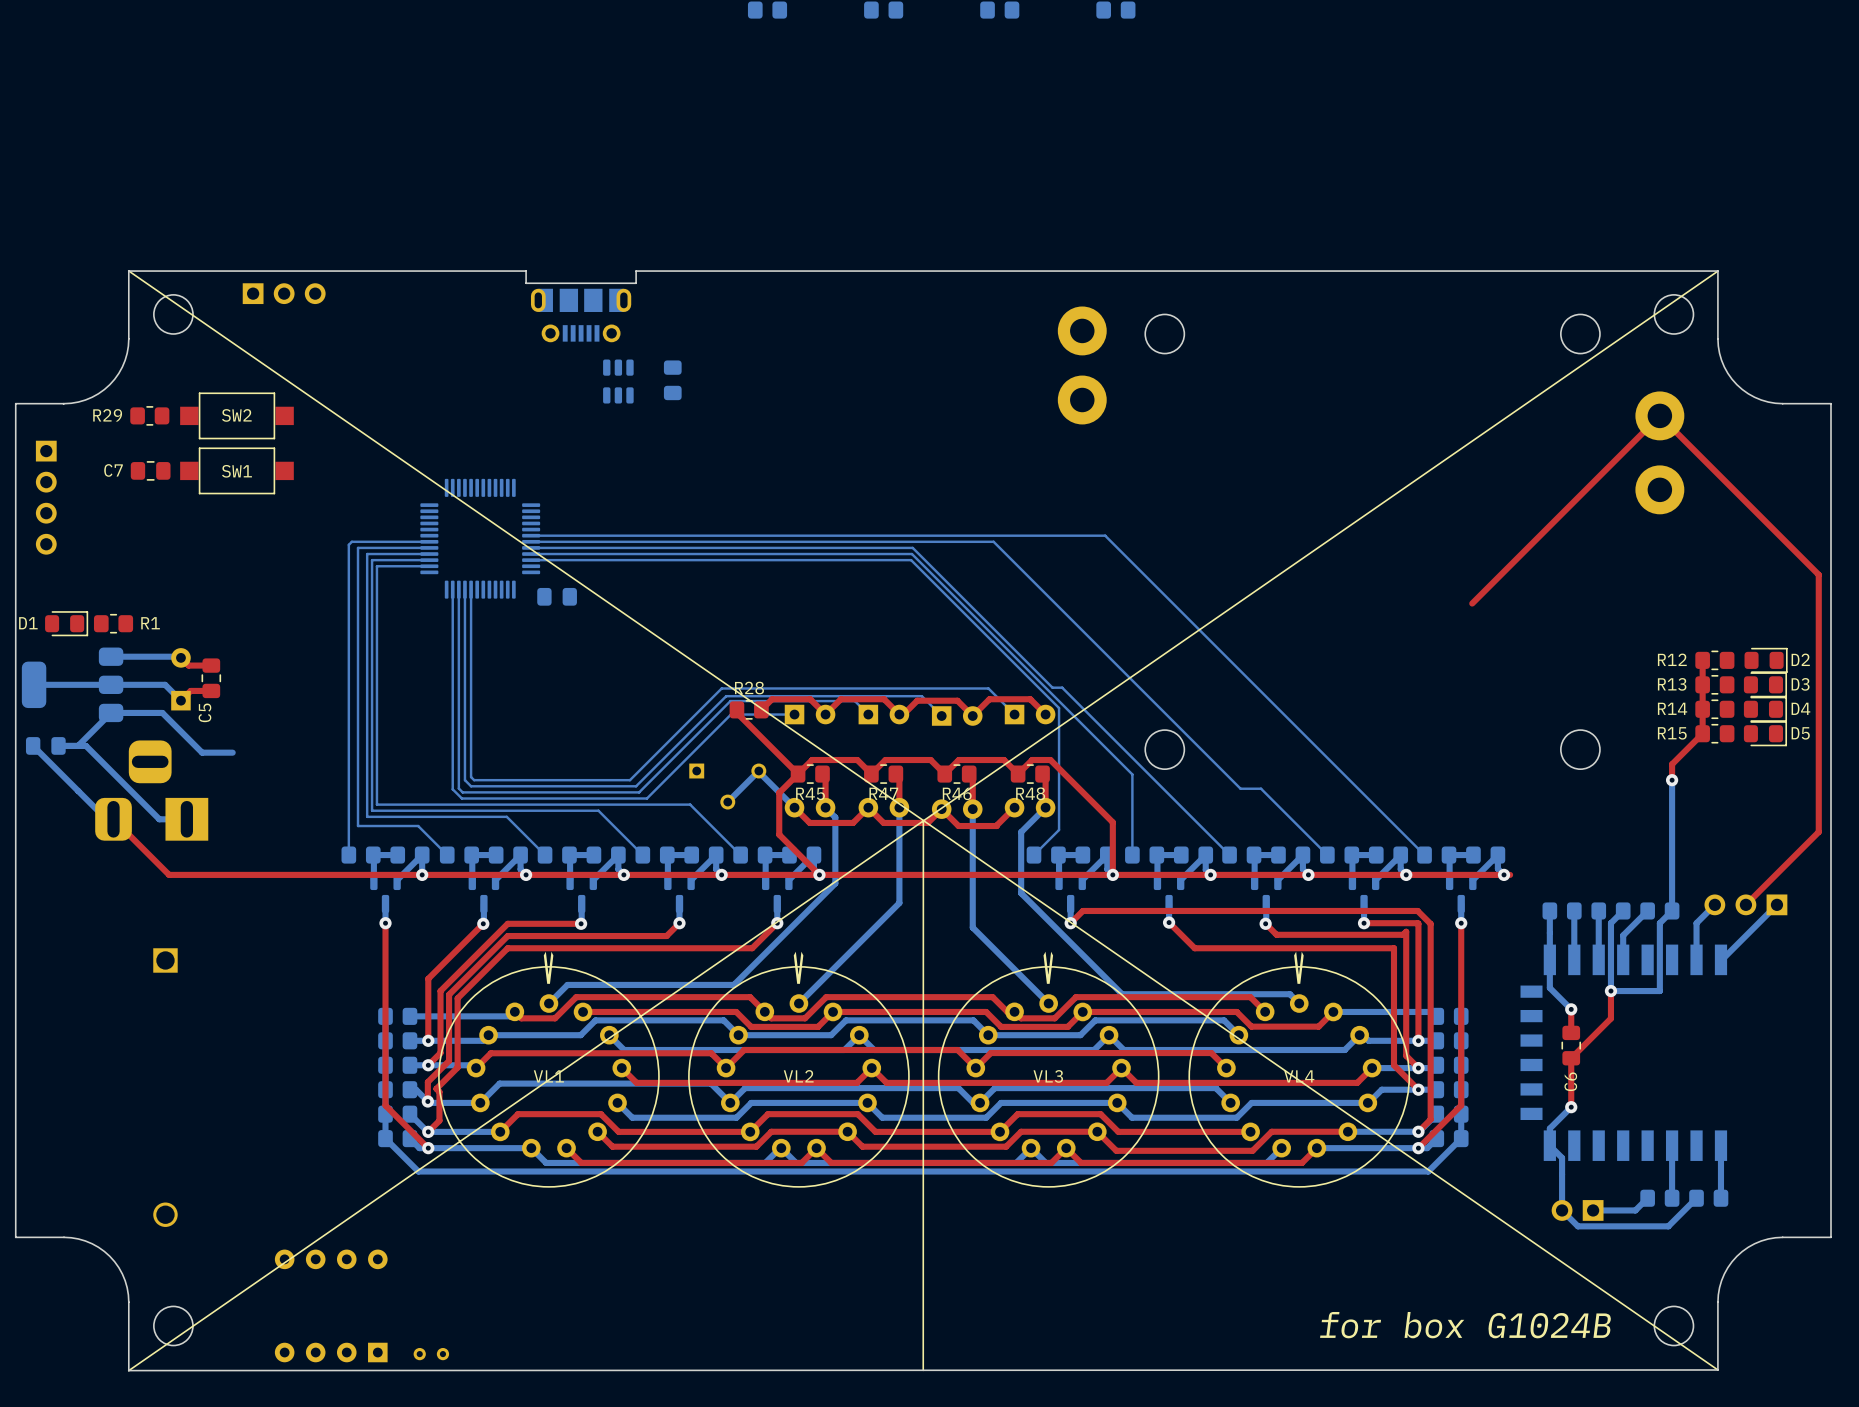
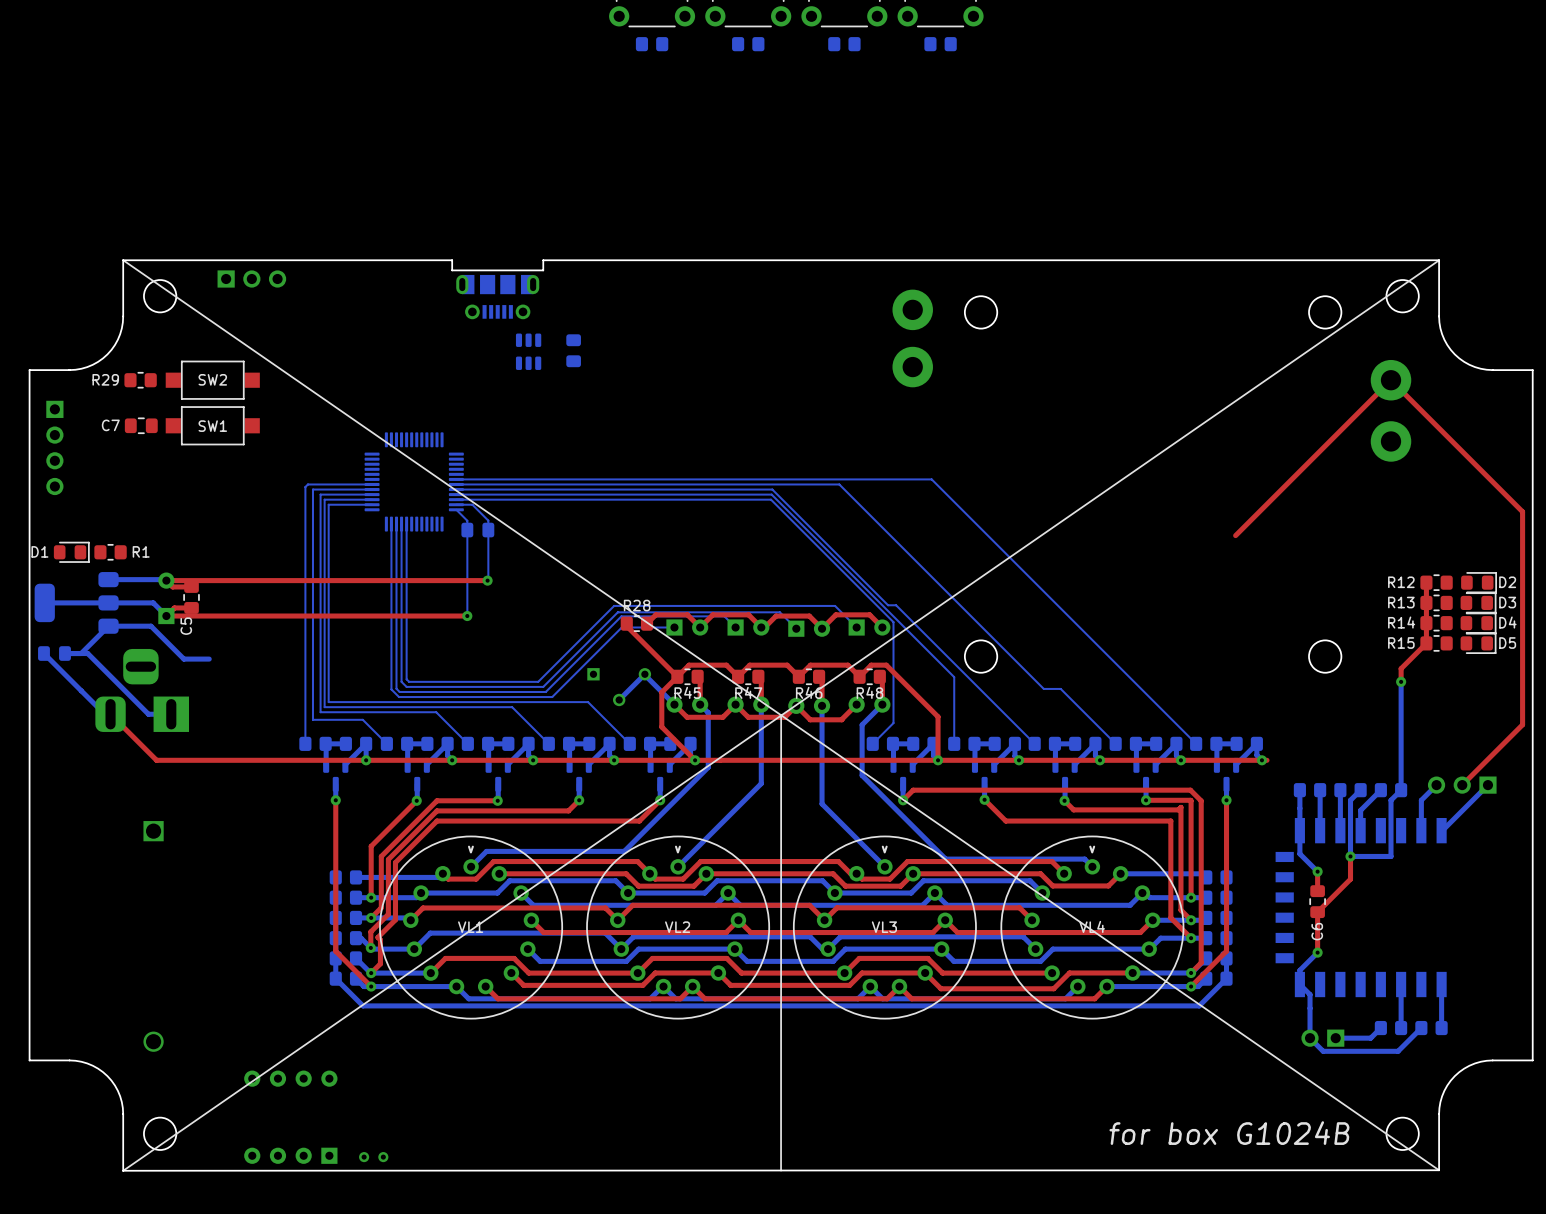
bottom track: none -> (456, 504) (472, 504) (488, 520) (487, 580)
bottom track: none -> (456, 509) (467, 520) (467, 615)
top track: none -> (166, 580) (487, 580)
via: none -> (487, 580)
top track: none -> (166, 616) (467, 616)
via: none -> (467, 616)

